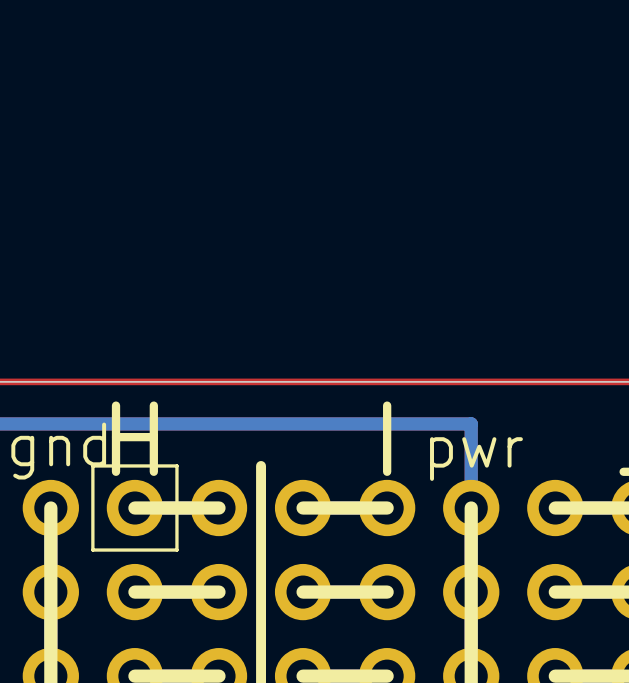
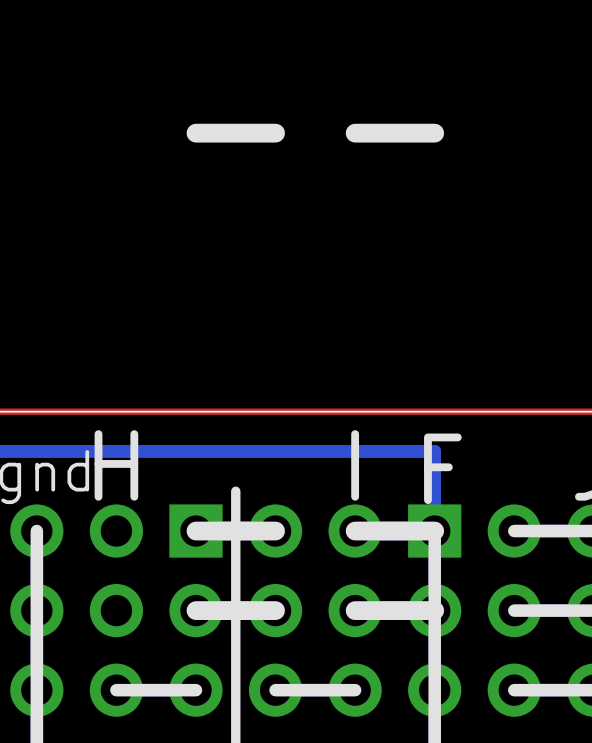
line: none -> (275, 133) (195, 133)
line: none -> (434, 133) (355, 133)
text: none -> F (442, 468)
text: pwr (476, 459) -> none
line: (176, 465) (92, 465) (92, 550) (176, 550) (176, 465) -> none
part footprint: [190, 479, 248, 537] -> [169, 504, 223, 558]
part footprint: [443, 479, 500, 537] -> [408, 504, 462, 558]
line: (219, 508) (134, 508) -> (195, 531) (275, 531)
line: (387, 508) (303, 508) -> (355, 531) (434, 531)
line: (219, 592) (134, 592) -> (195, 610) (275, 610)
line: (387, 592) (303, 592) -> (355, 610) (434, 610)

